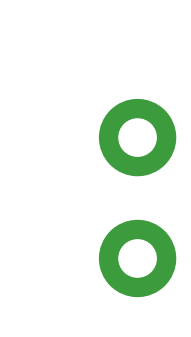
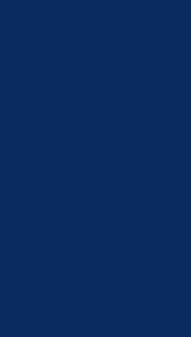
part: (137, 198) -> none

